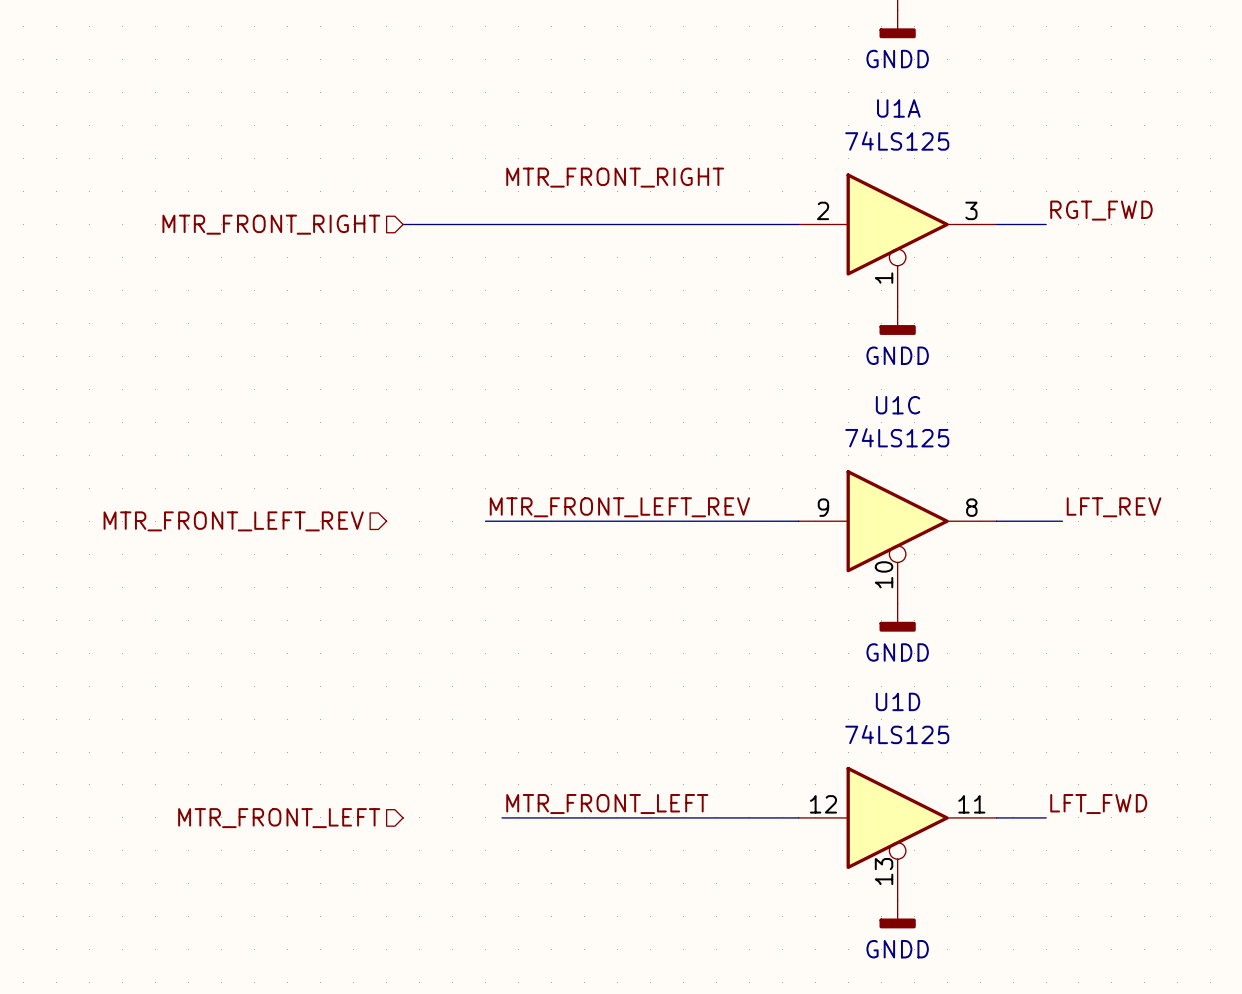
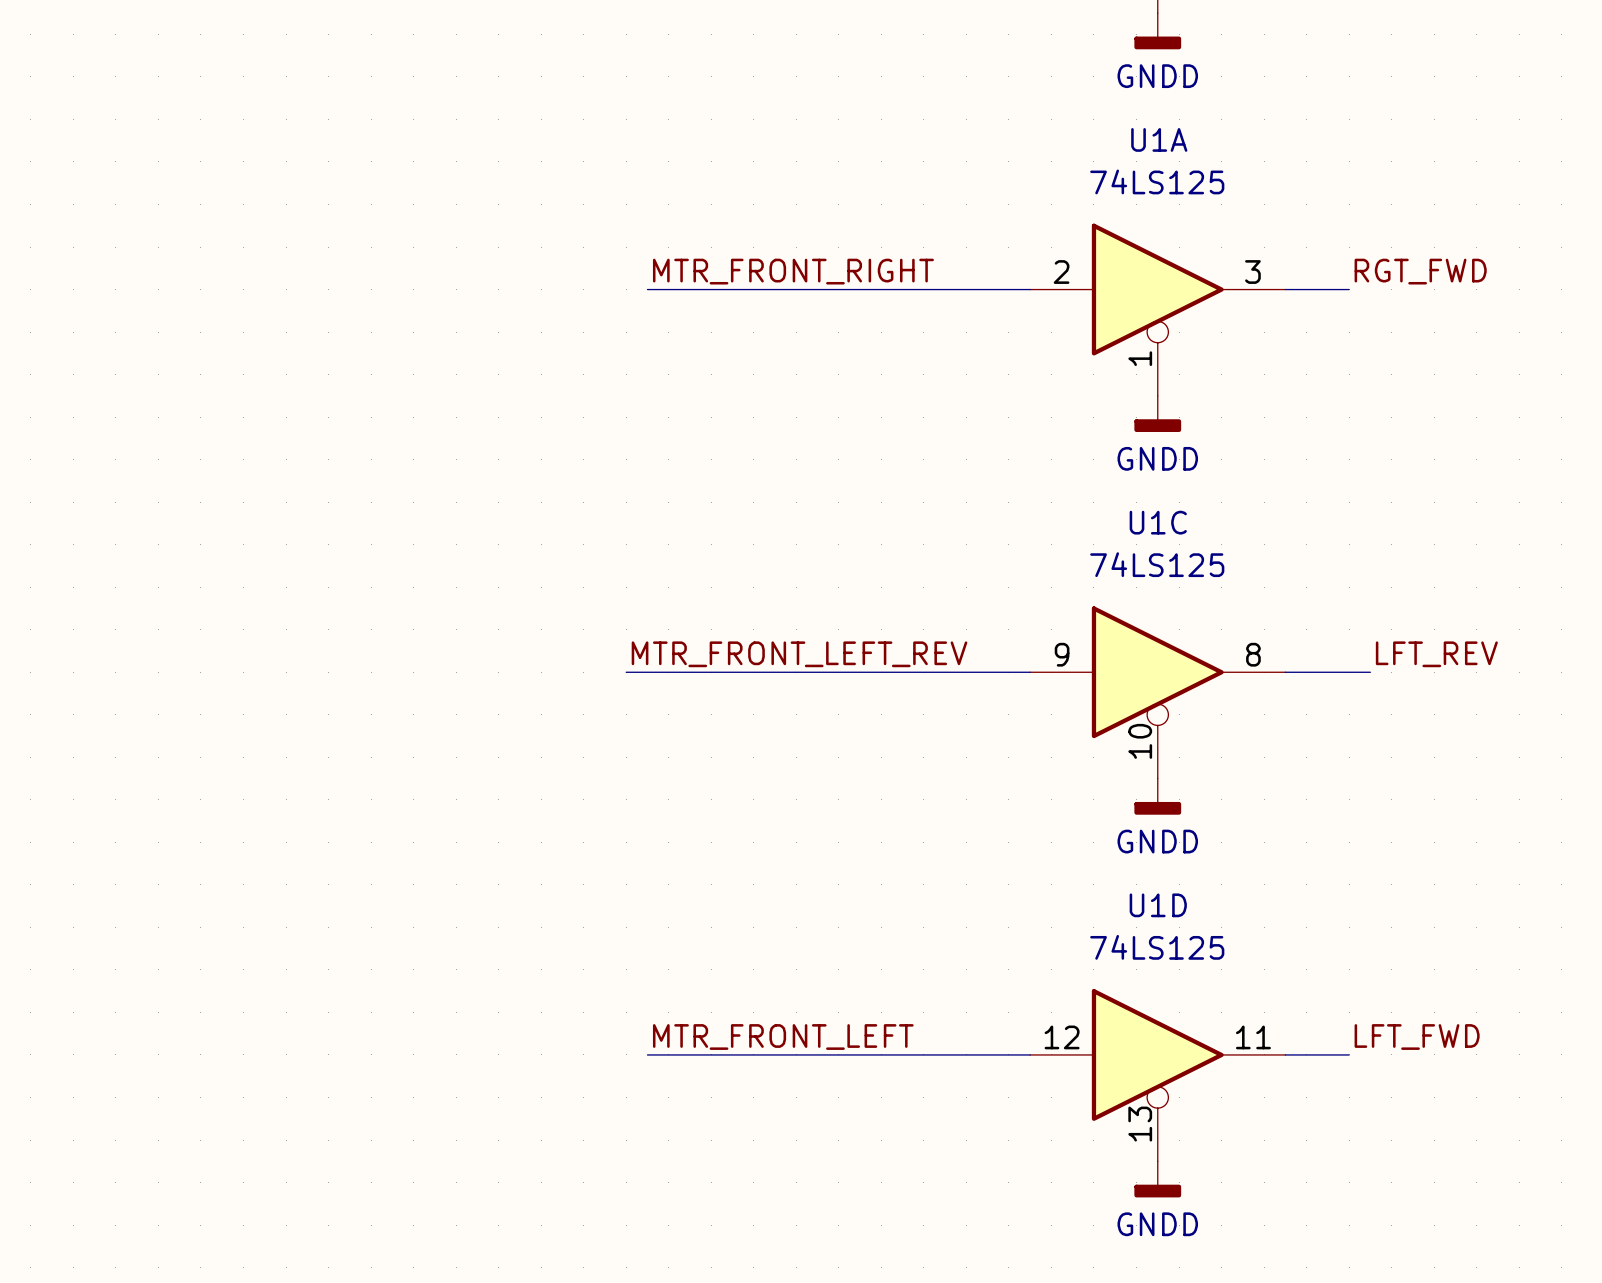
label position: MTR_FRONT_RIGHT (615, 177) -> MTR_FRONT_RIGHT (793, 271)
hierarchical label: MTR_FRONT_RIGHT (271, 224) -> none
wire: (403, 224) (502, 224) -> none
hierarchical label: MTR_FRONT_LEFT_REV (233, 521) -> none
hierarchical label: MTR_FRONT_LEFT (279, 818) -> none

